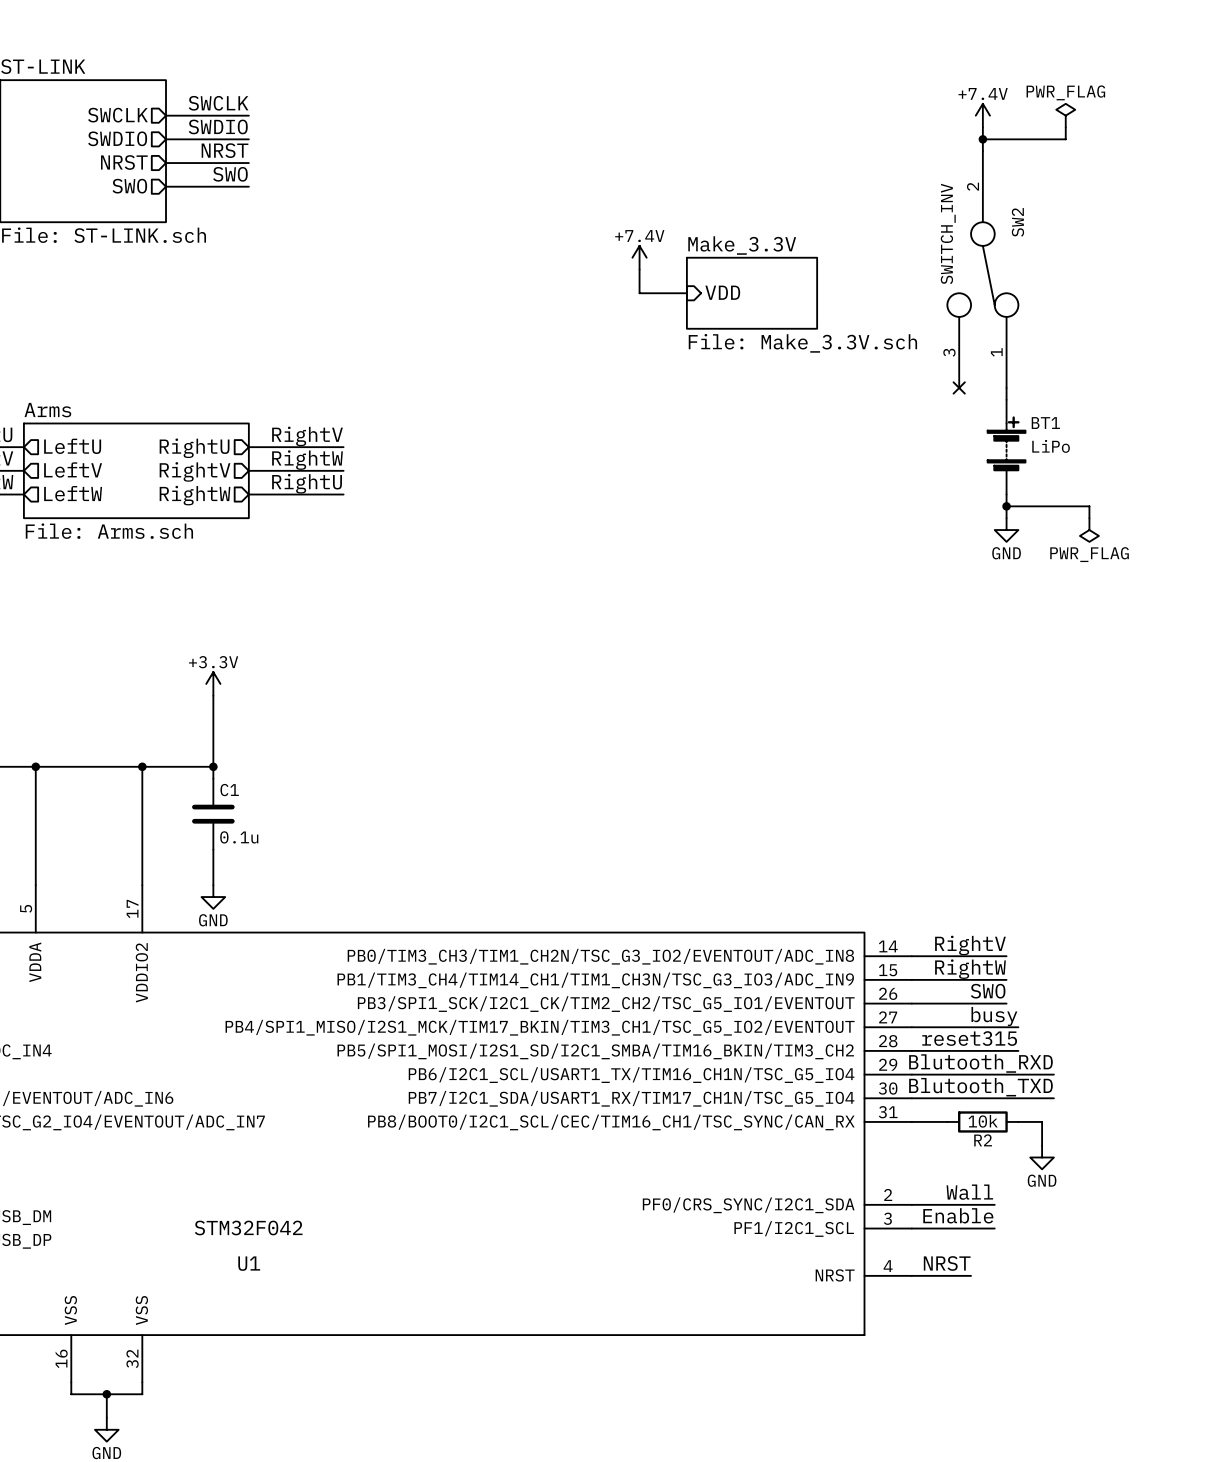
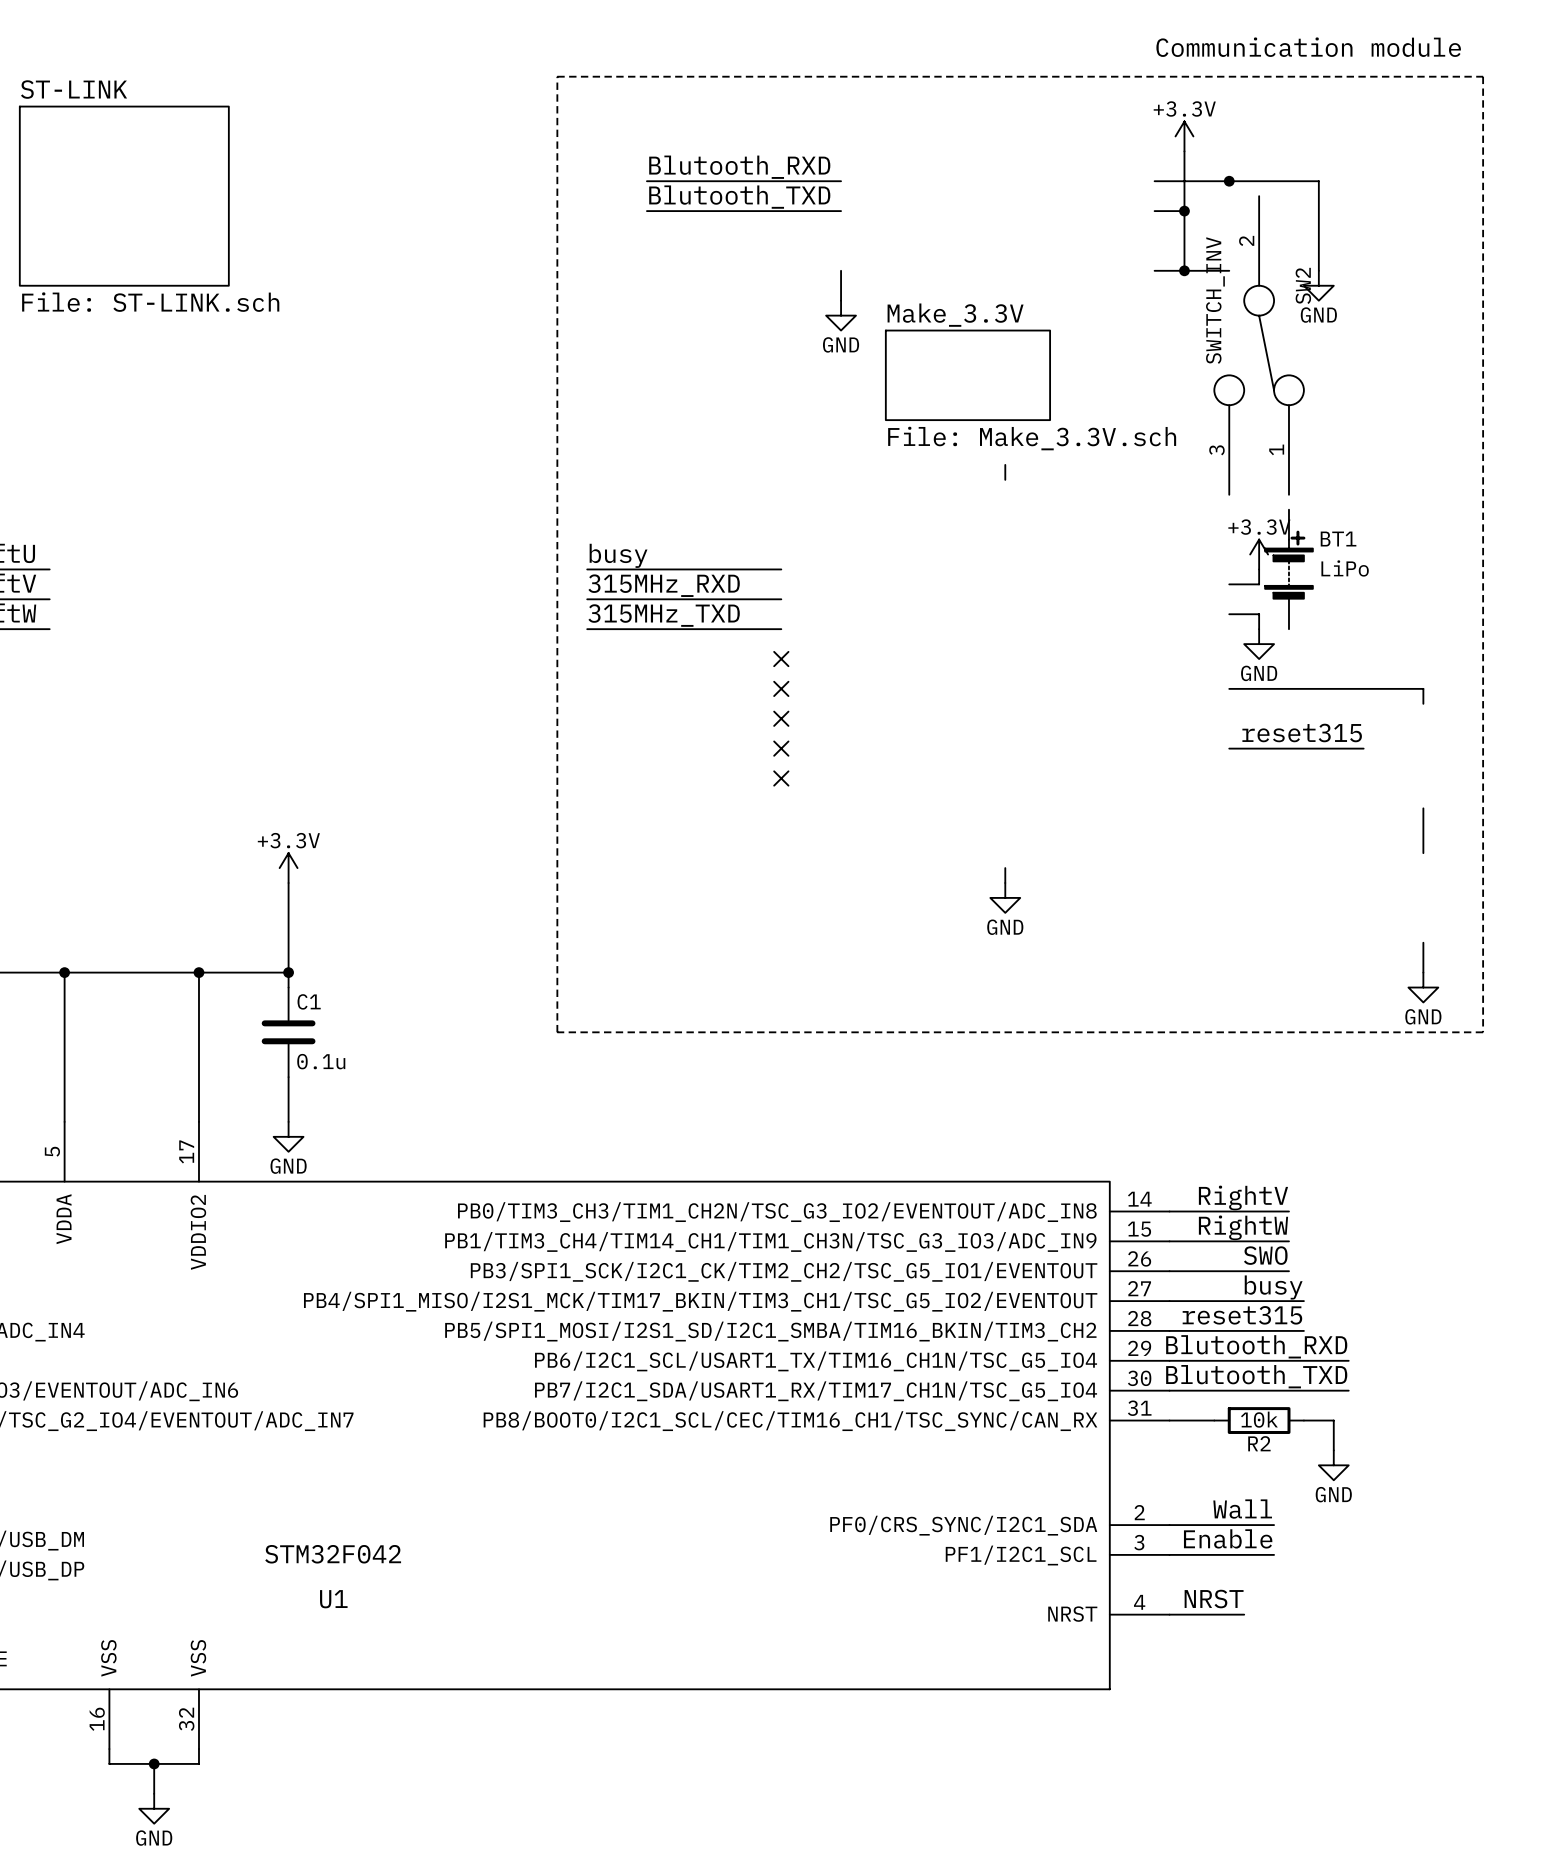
text: none -> Communication module (1308, 47)
line: none -> (557, 76) (557, 1032) (1483, 1032) (1483, 76) (557, 76)
label: SWCLK (218, 103) -> none
power symbol: none -> +3.3V (1184, 136)
sheet pin: SWCLK (117, 115) -> none
wire: (166, 115) (248, 115) -> none
wire: none -> (1184, 151) (1184, 270)
power symbol: +7.4V (982, 115) -> none
power symbol: PWR_FLAG (1065, 115) -> none
label: SWDIO (218, 126) -> none
wire: (982, 127) (982, 151) -> none
wire: (1065, 127) (1065, 139) (1030, 139) -> (1318, 270) (1318, 181)
label: none -> Blutooth_RXD (739, 167)
sheet pin: SWDIO (117, 138) -> none
wire: (166, 139) (248, 139) -> none
wire: none -> (646, 181) (841, 181)
wire: none -> (1154, 181) (1259, 181)
junction position: (982, 139) -> (1229, 181)
label: NRST (225, 150) -> none
label: none -> Blutooth_TXD (739, 197)
sheet pin: NRST (124, 162) -> none
wire: (166, 163) (248, 163) -> none
wire: none -> (646, 211) (841, 211)
wire: none -> (1154, 211) (1184, 211)
junction: none -> (1184, 211)
label: SWO (230, 174) -> none
sheet pin: SWO (129, 186) -> none
wire: (166, 186) (248, 186) -> none
wire: none -> (841, 270) (841, 300)
wire: none -> (1154, 270) (1229, 270)
junction: none -> (1184, 270)
power symbol: none -> GND (1318, 285)
power symbol: none -> GND (841, 315)
power symbol: +7.4V (639, 257) -> none
wire: (639, 269) (639, 293) (686, 293) -> none
sheet pin: VDD (722, 292) -> none
no-connect mark: (959, 387) -> none
wire: (1006, 387) (1006, 399) -> (1005, 464) (1005, 479)
power symbol: none -> +3.3V (1259, 554)
label: RightV (307, 436) -> none
label: none -> busy (618, 555)
sheet pin: LeftU (72, 446) -> none
wire: (248, 447) (343, 447) -> none
wire: none -> (587, 569) (781, 569)
wire: none -> (1259, 569) (1259, 584) (1229, 584)
sheet pin: RightU (194, 448) -> none
label: RightW (307, 460) -> none
label: none -> 315MHz_RXD (664, 585)
sheet pin: LeftV (73, 470) -> none
sheet Arms: File: Arms.sch (136, 470) -> none
wire: (248, 470) (343, 470) -> none
wire: none -> (587, 599) (781, 599)
sheet pin: RightV (195, 471) -> none
wire: none -> (1229, 614) (1259, 614) (1259, 629)
label: RightU (307, 483) -> none
label: none -> 315MHz_TXD (664, 615)
sheet pin: LeftW (73, 493) -> none
wire: (248, 494) (343, 494) -> none
wire: none -> (587, 629) (781, 629)
wire: (1006, 494) (1006, 518) -> none
sheet pin: RightW (195, 495) -> none
wire: (1006, 506) (1089, 506) (1089, 518) -> none
junction: (1006, 506) -> none
no-connect mark: none -> (781, 659)
power symbol position: GND (1006, 530) -> GND (1259, 644)
power symbol: PWR_FLAG (1089, 530) -> none
no-connect mark: none -> (781, 688)
wire: none -> (1229, 688) (1423, 688) (1423, 703)
no-connect mark: none -> (781, 718)
label: none -> reset315 (1302, 732)
no-connect mark: none -> (781, 748)
wire: none -> (1229, 748) (1363, 748)
no-connect mark: none -> (781, 778)
wire: none -> (1423, 808) (1423, 853)
wire: none -> (1005, 868) (1005, 883)
power symbol: none -> GND (1005, 897)
wire: none -> (1423, 942) (1423, 972)
power symbol: none -> GND (1423, 987)

